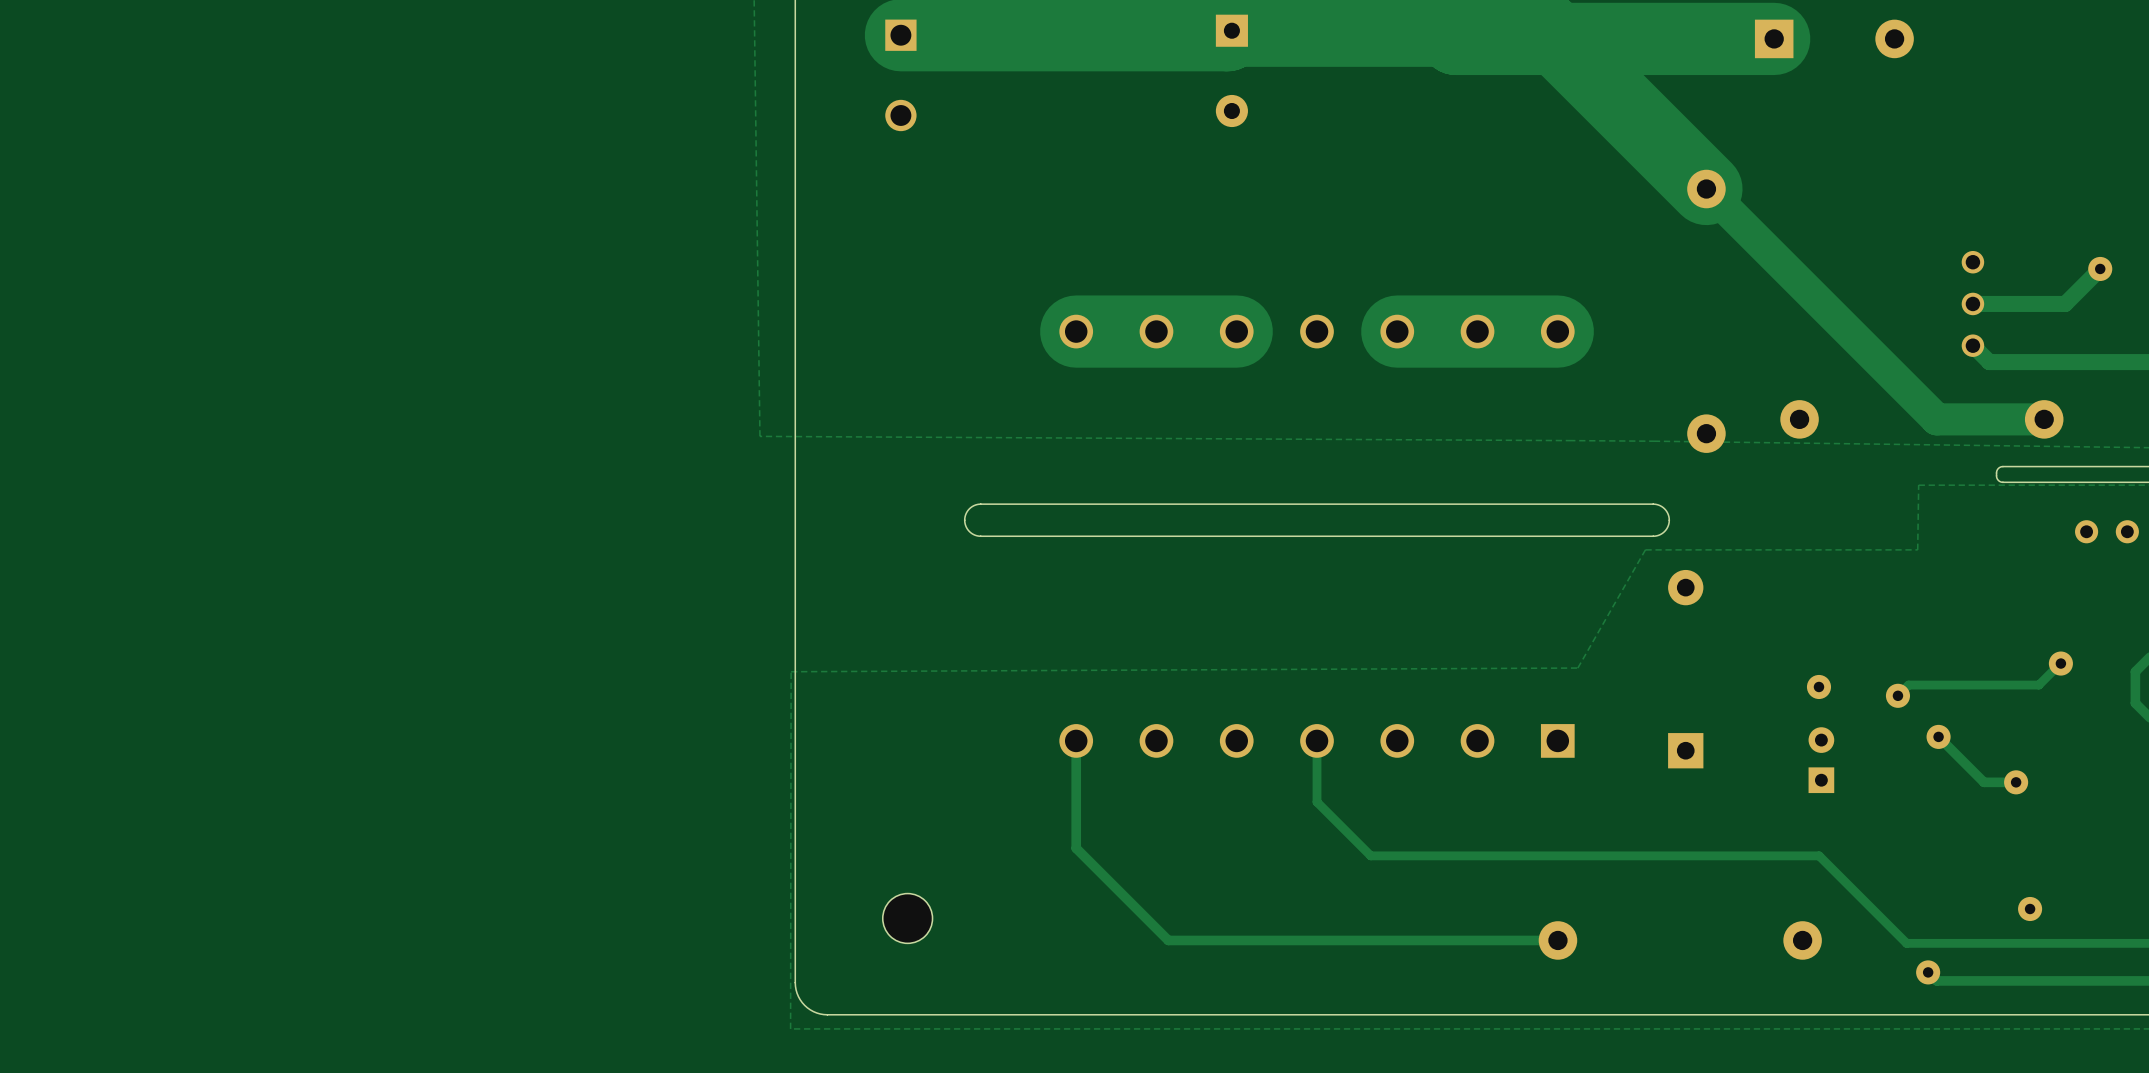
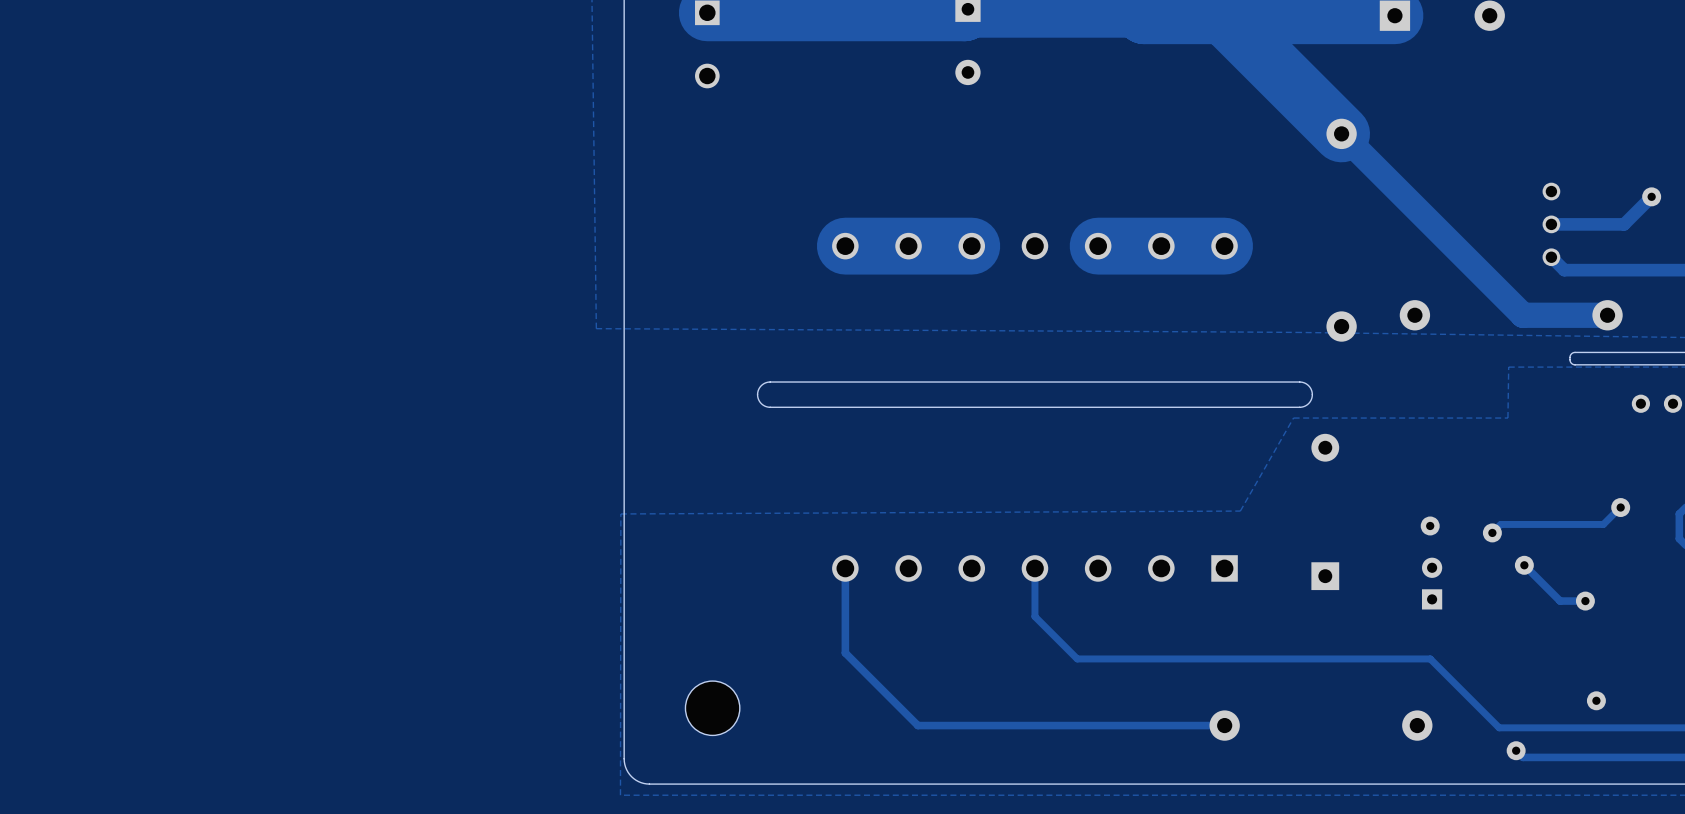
part footprint: [882, 893, 933, 944] -> [685, 681, 740, 736]

